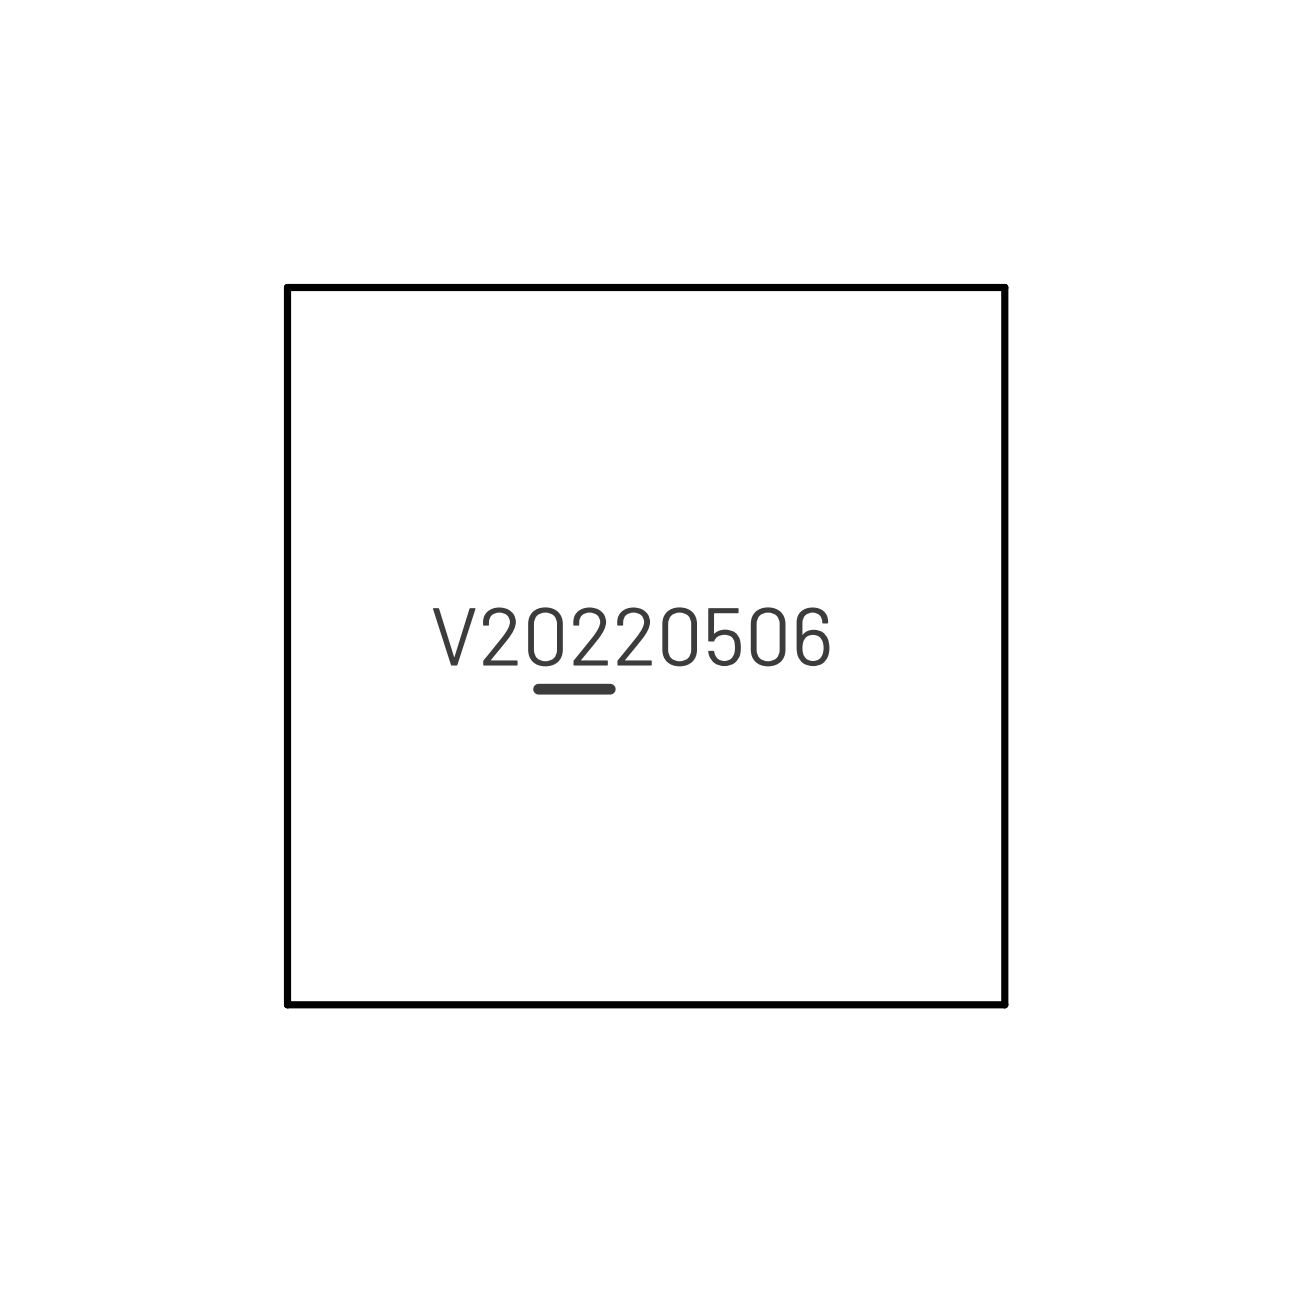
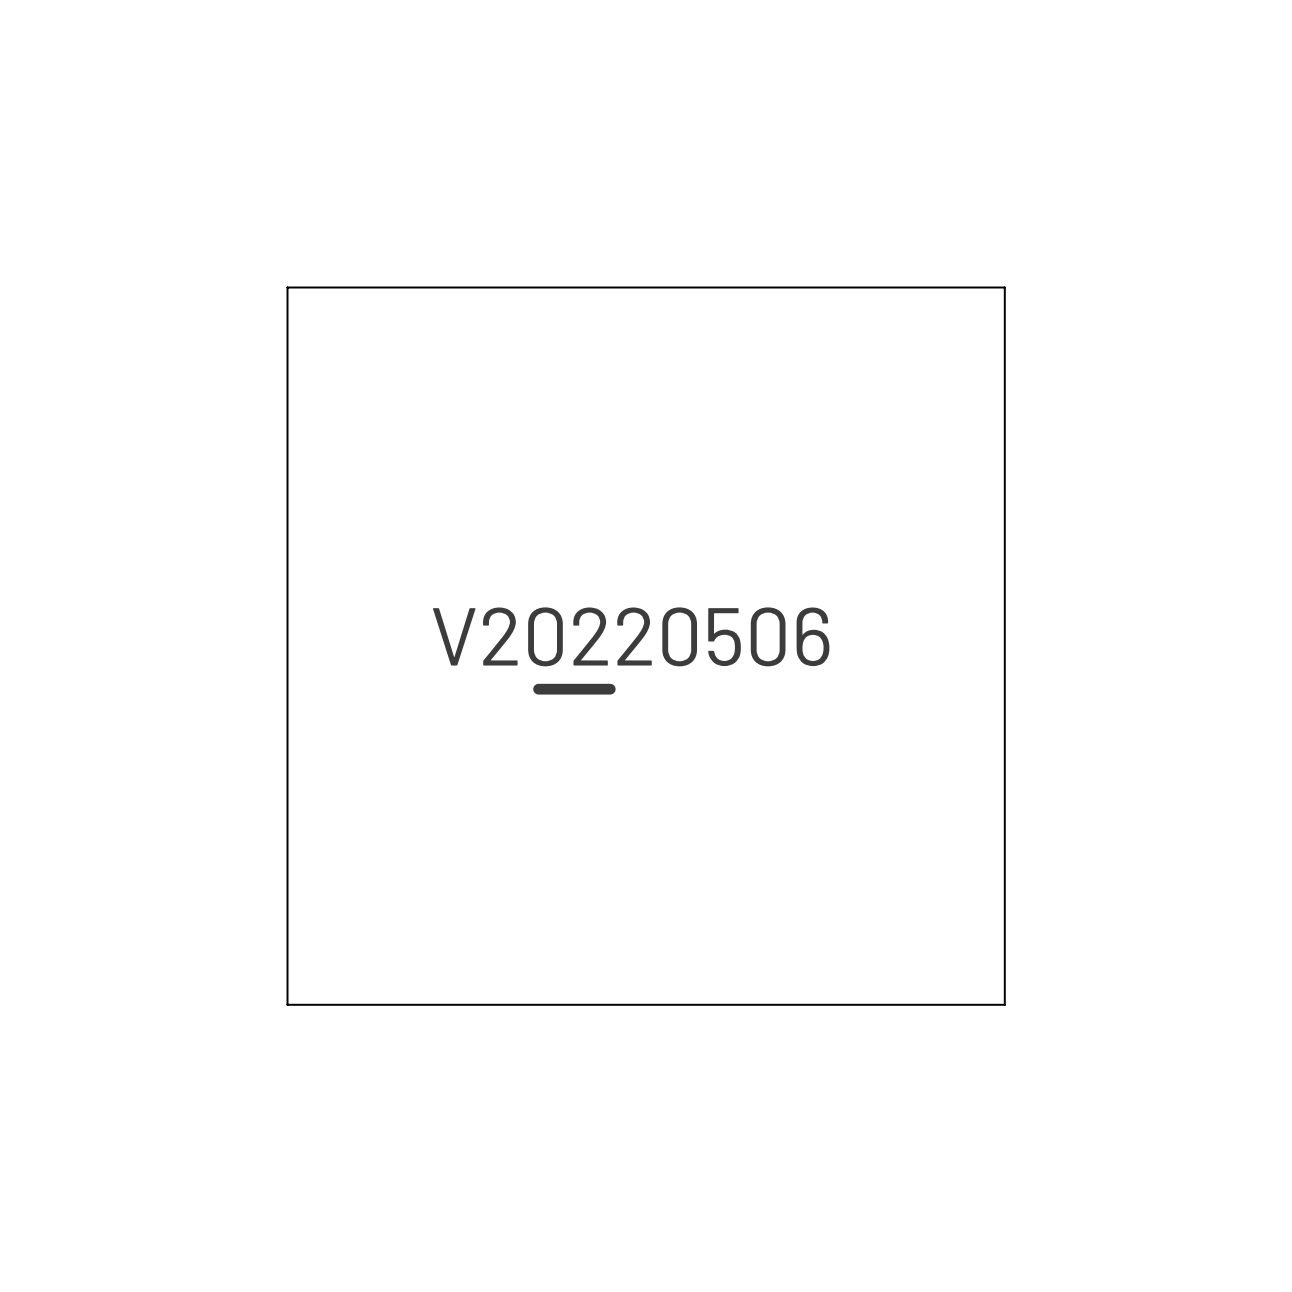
board edge width: thick (287, 287) (1004, 287) (1004, 1004) (287, 1004) (287, 287) -> thin (287, 287) (1004, 287) (1004, 1004) (287, 1004) (287, 287)

